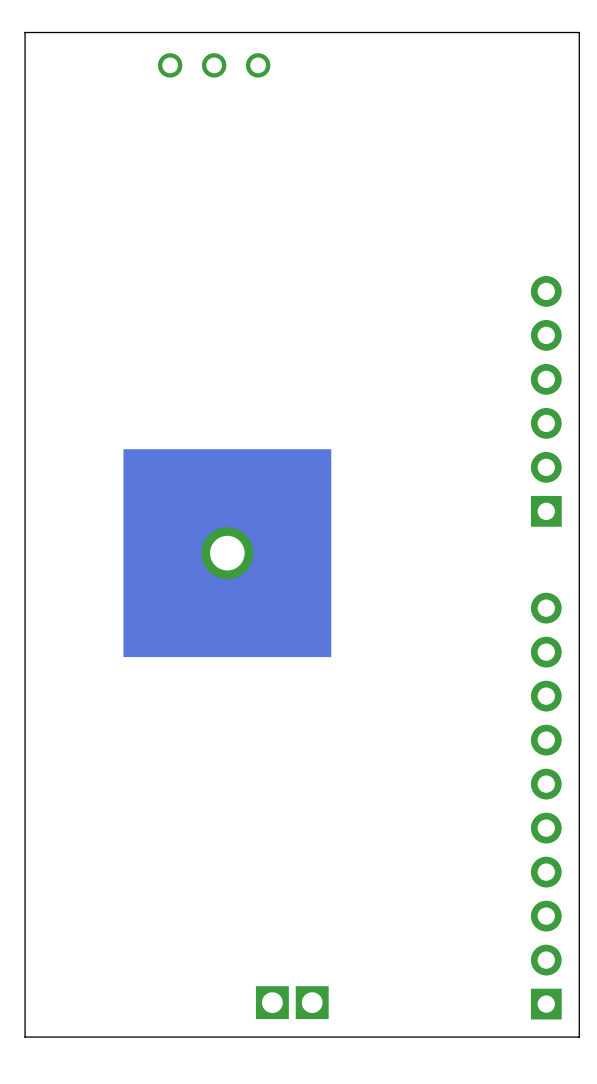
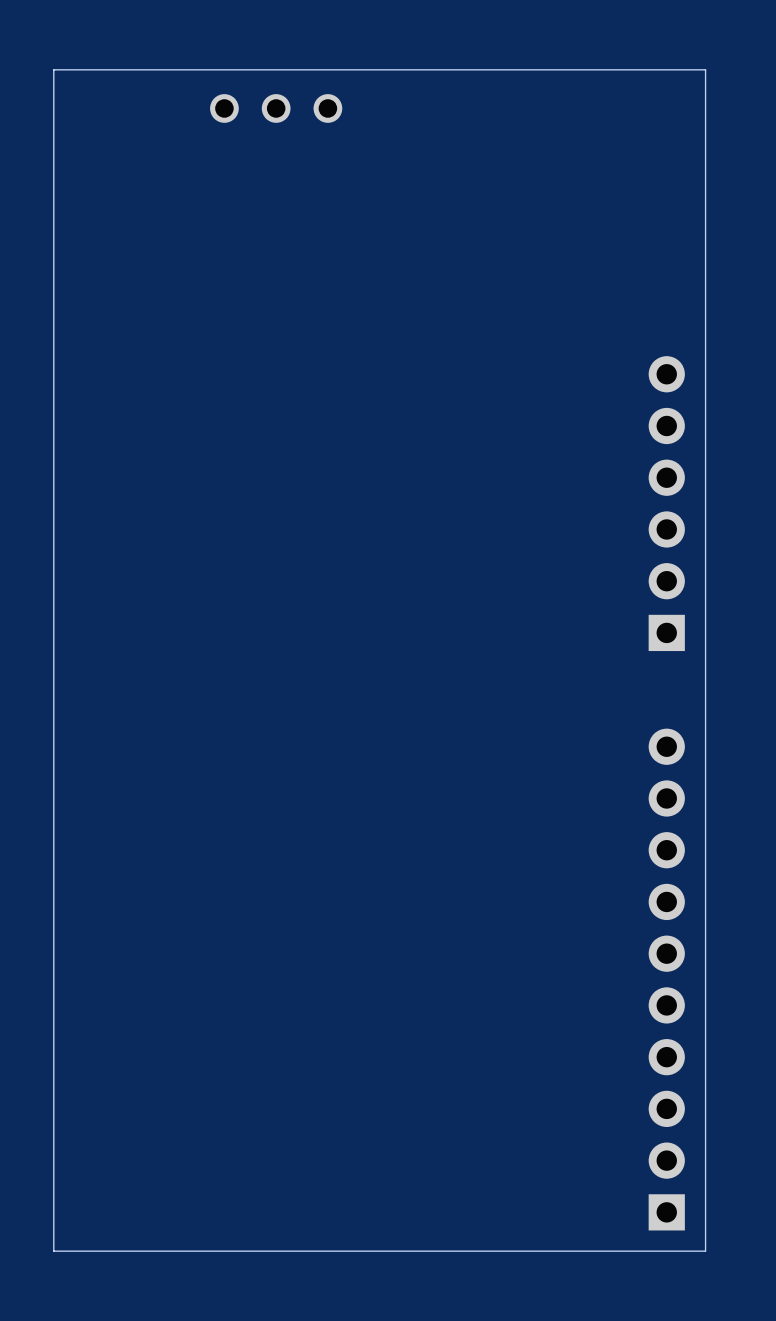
part: (227, 553) -> none
part: (292, 1002) -> none

